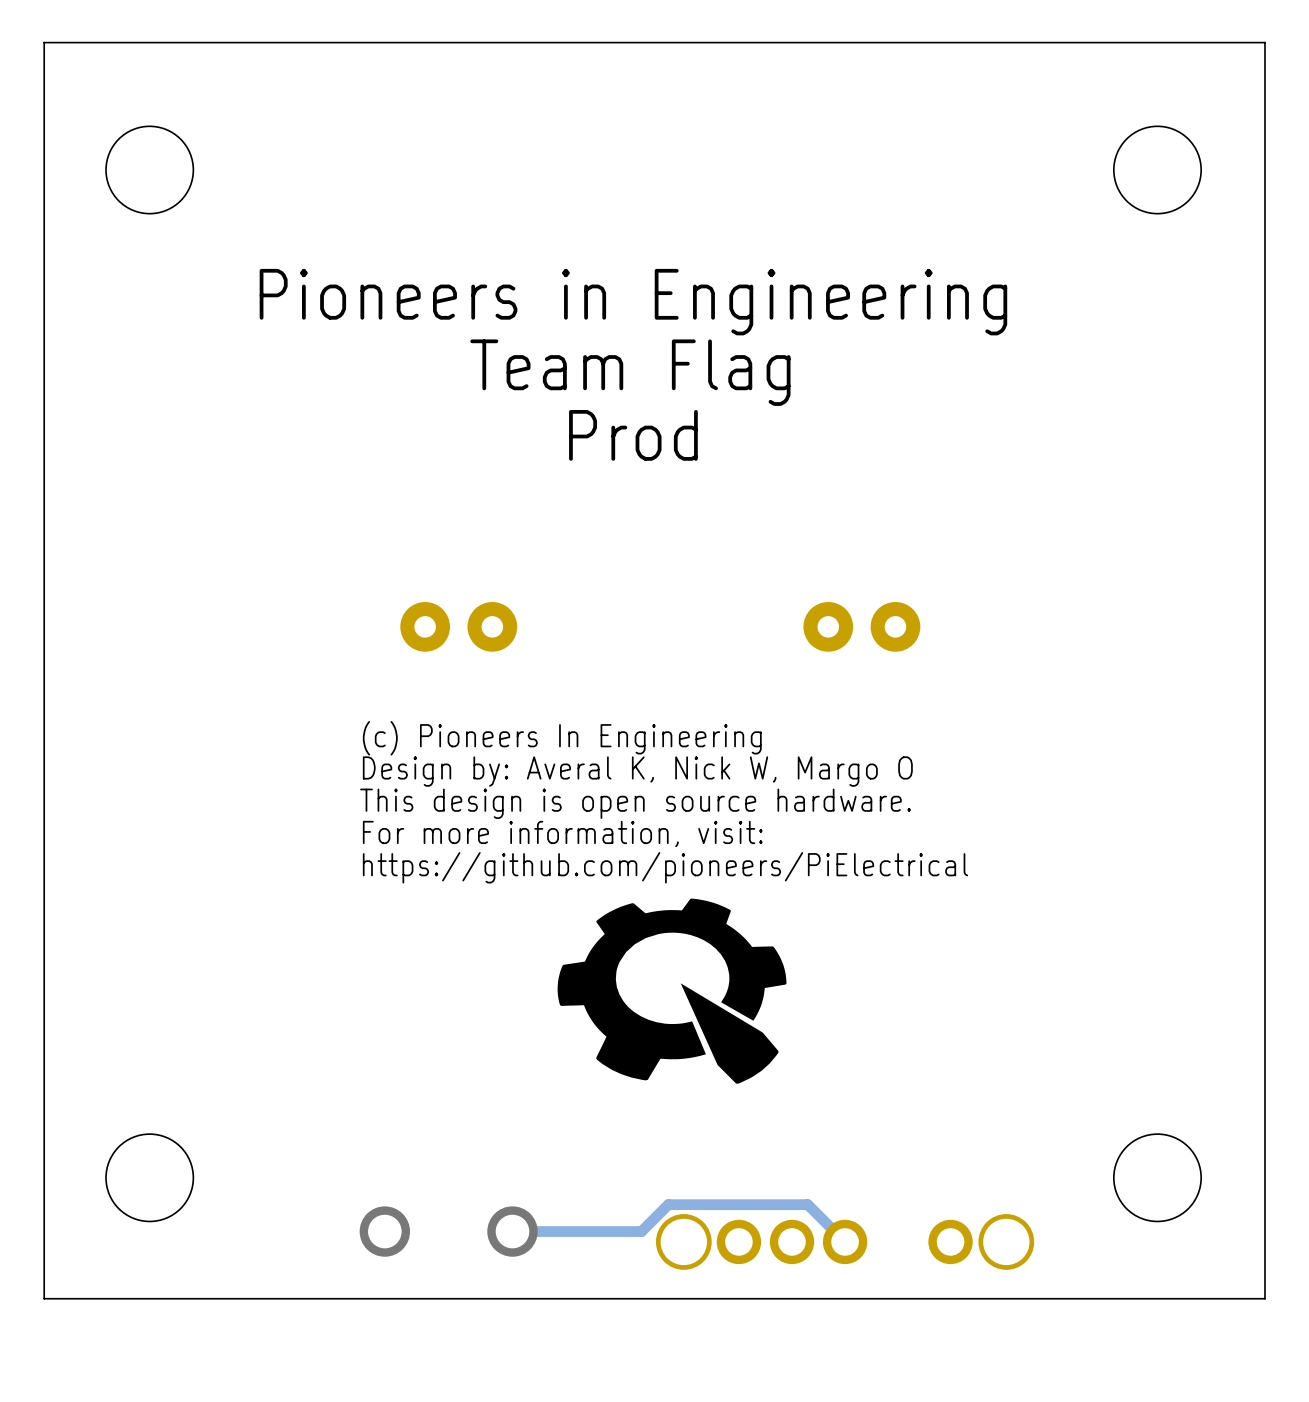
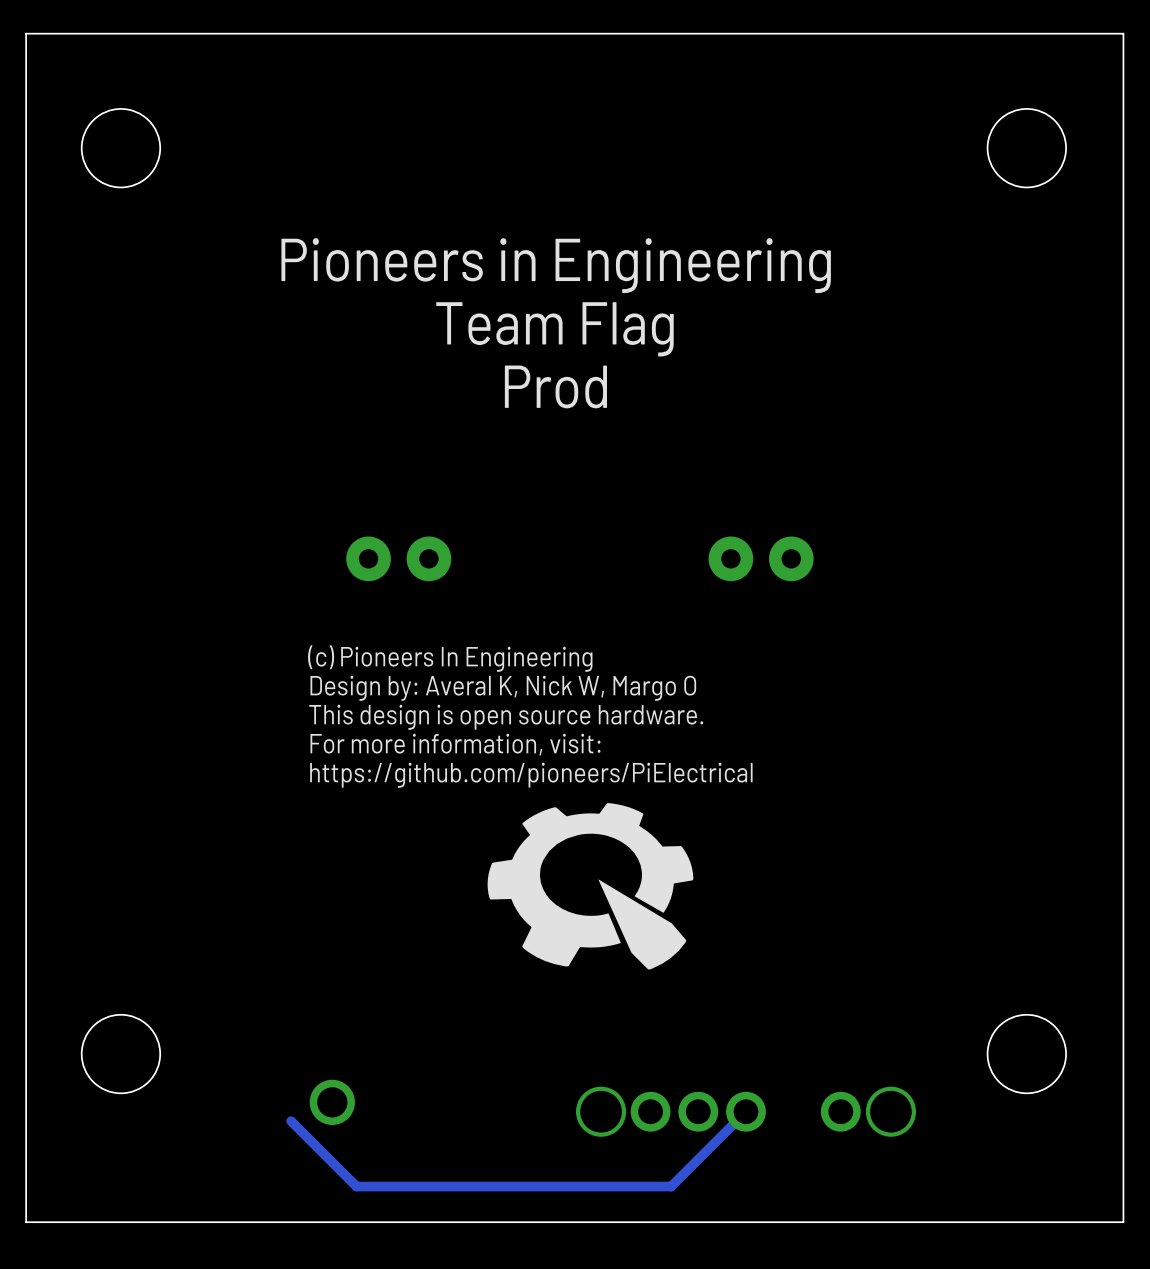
track: (512, 1231) (641, 1231) (668, 1204) (807, 1204) (845, 1241) -> (291, 1121) (356, 1186) (671, 1186) (745, 1111)
via: (512, 1231) -> none
board edge: (1264, 1298) (44, 1298) -> (1123, 1162) (1123, 1222) (26, 1222) (26, 1162)

